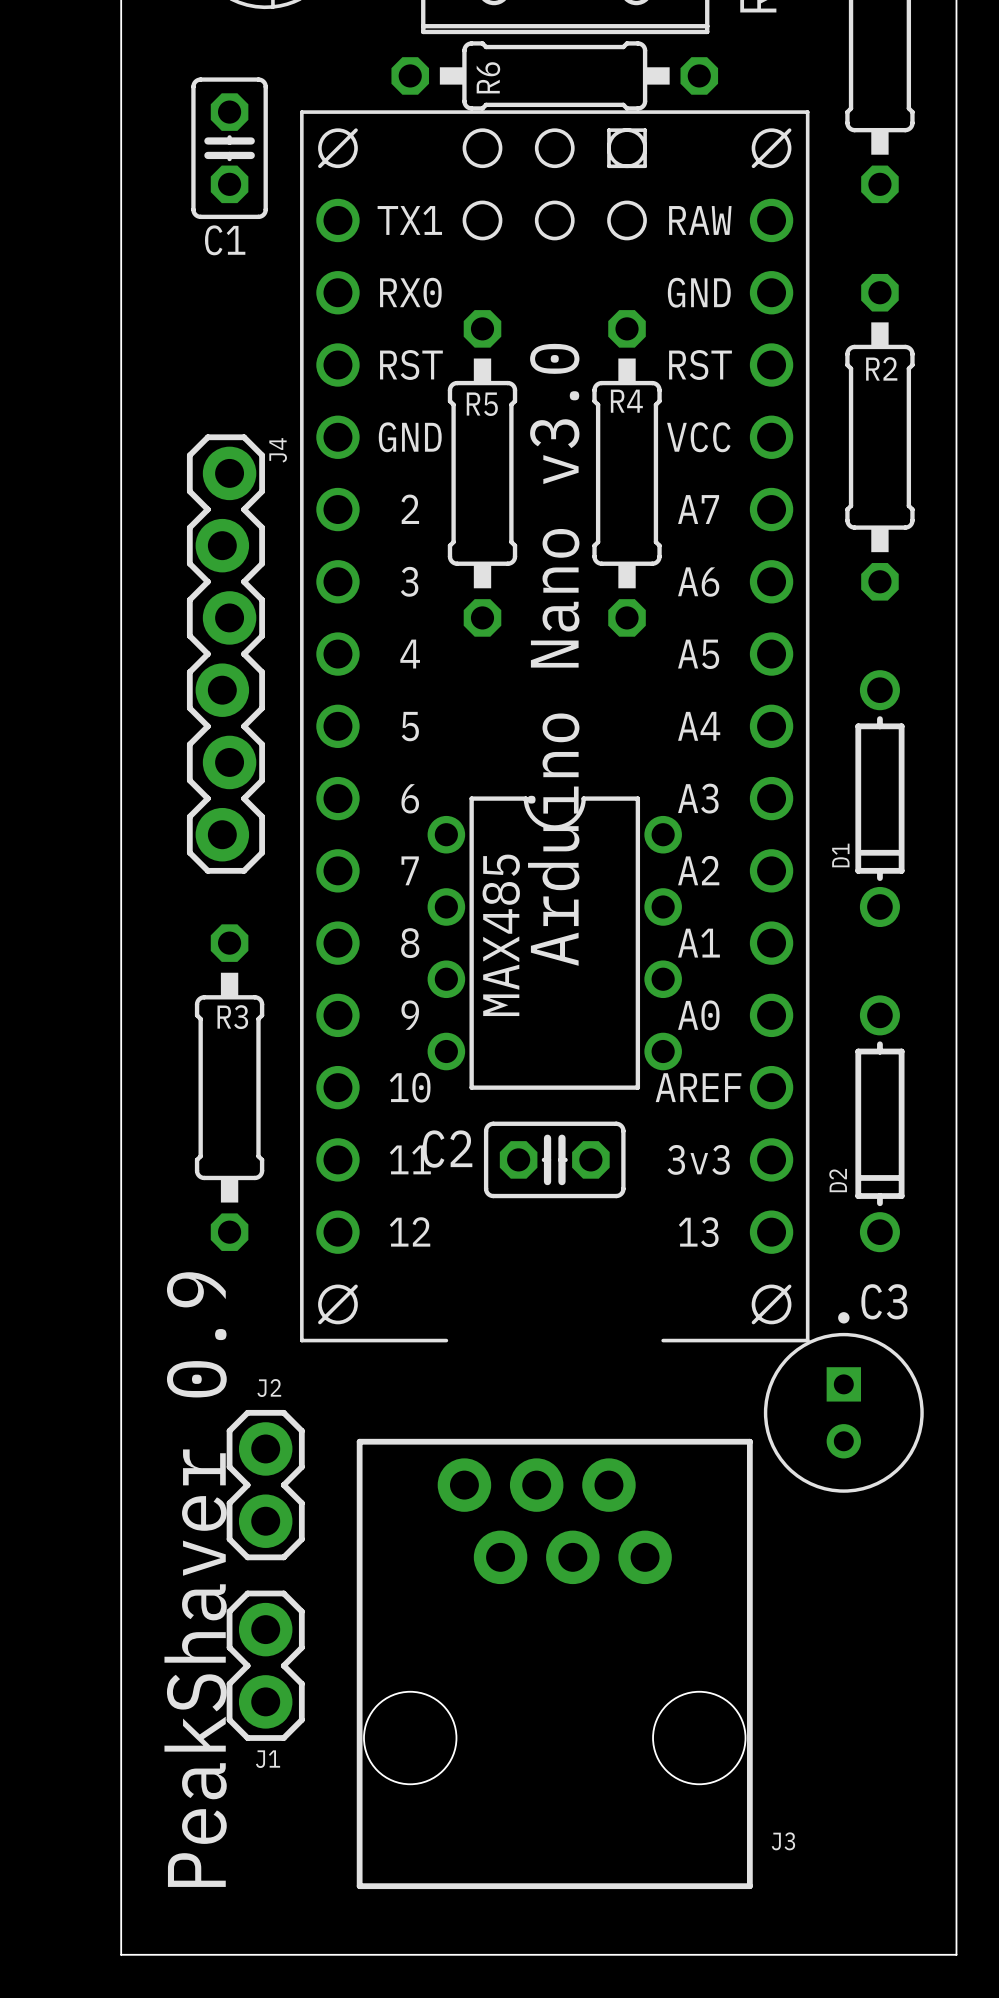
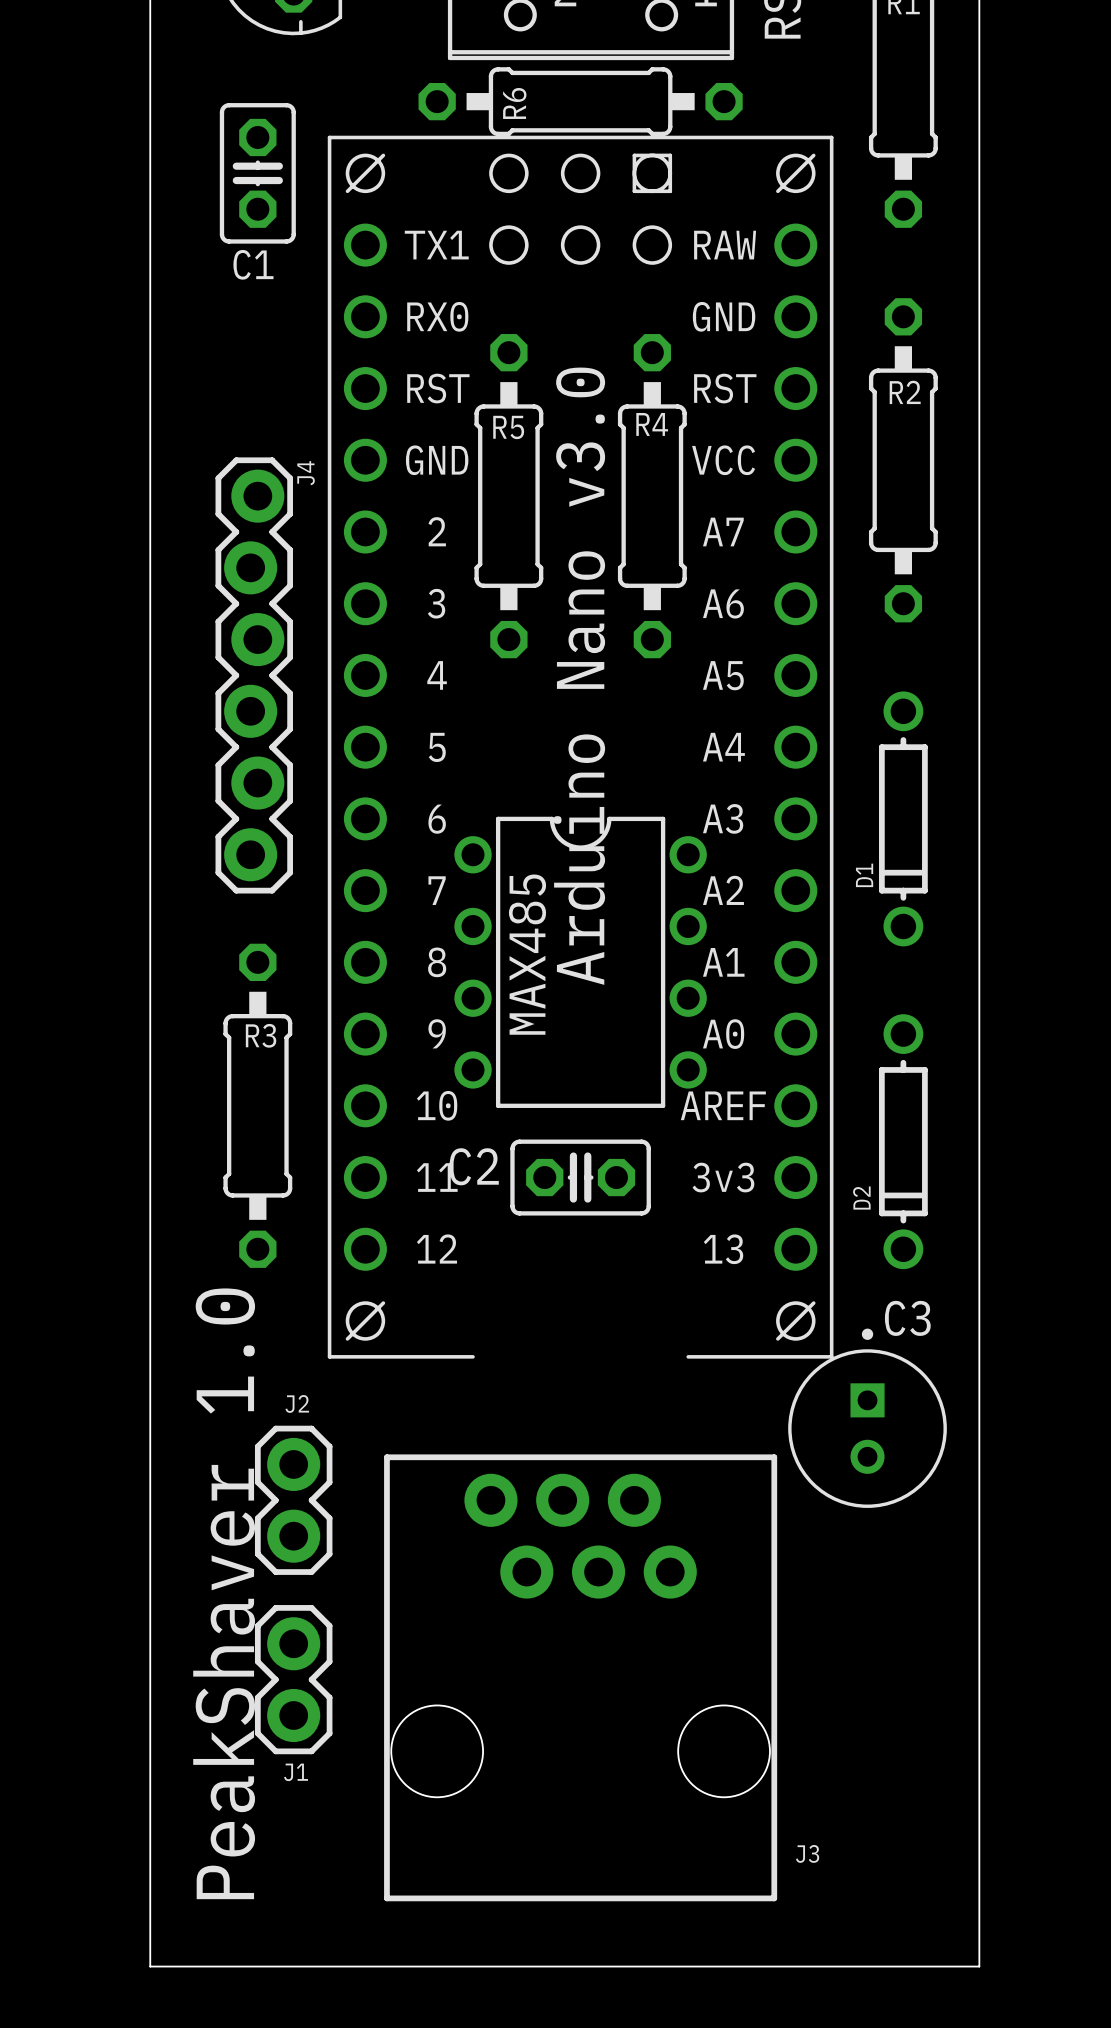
text: PeakShaver 0.9 (195, 1579) -> PeakShaver 1.0 (224, 1593)

